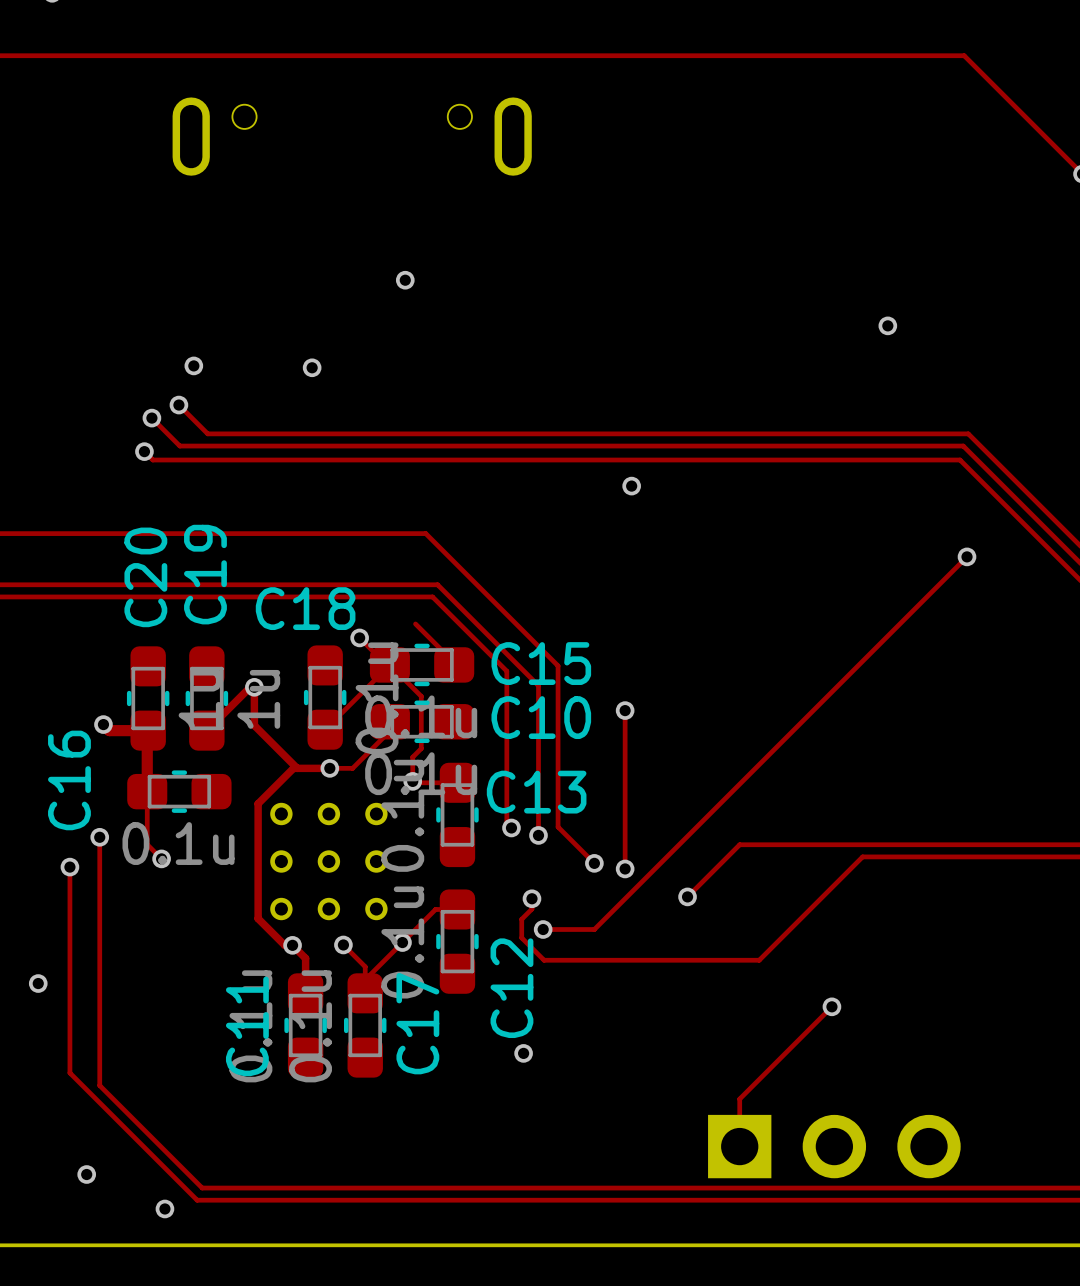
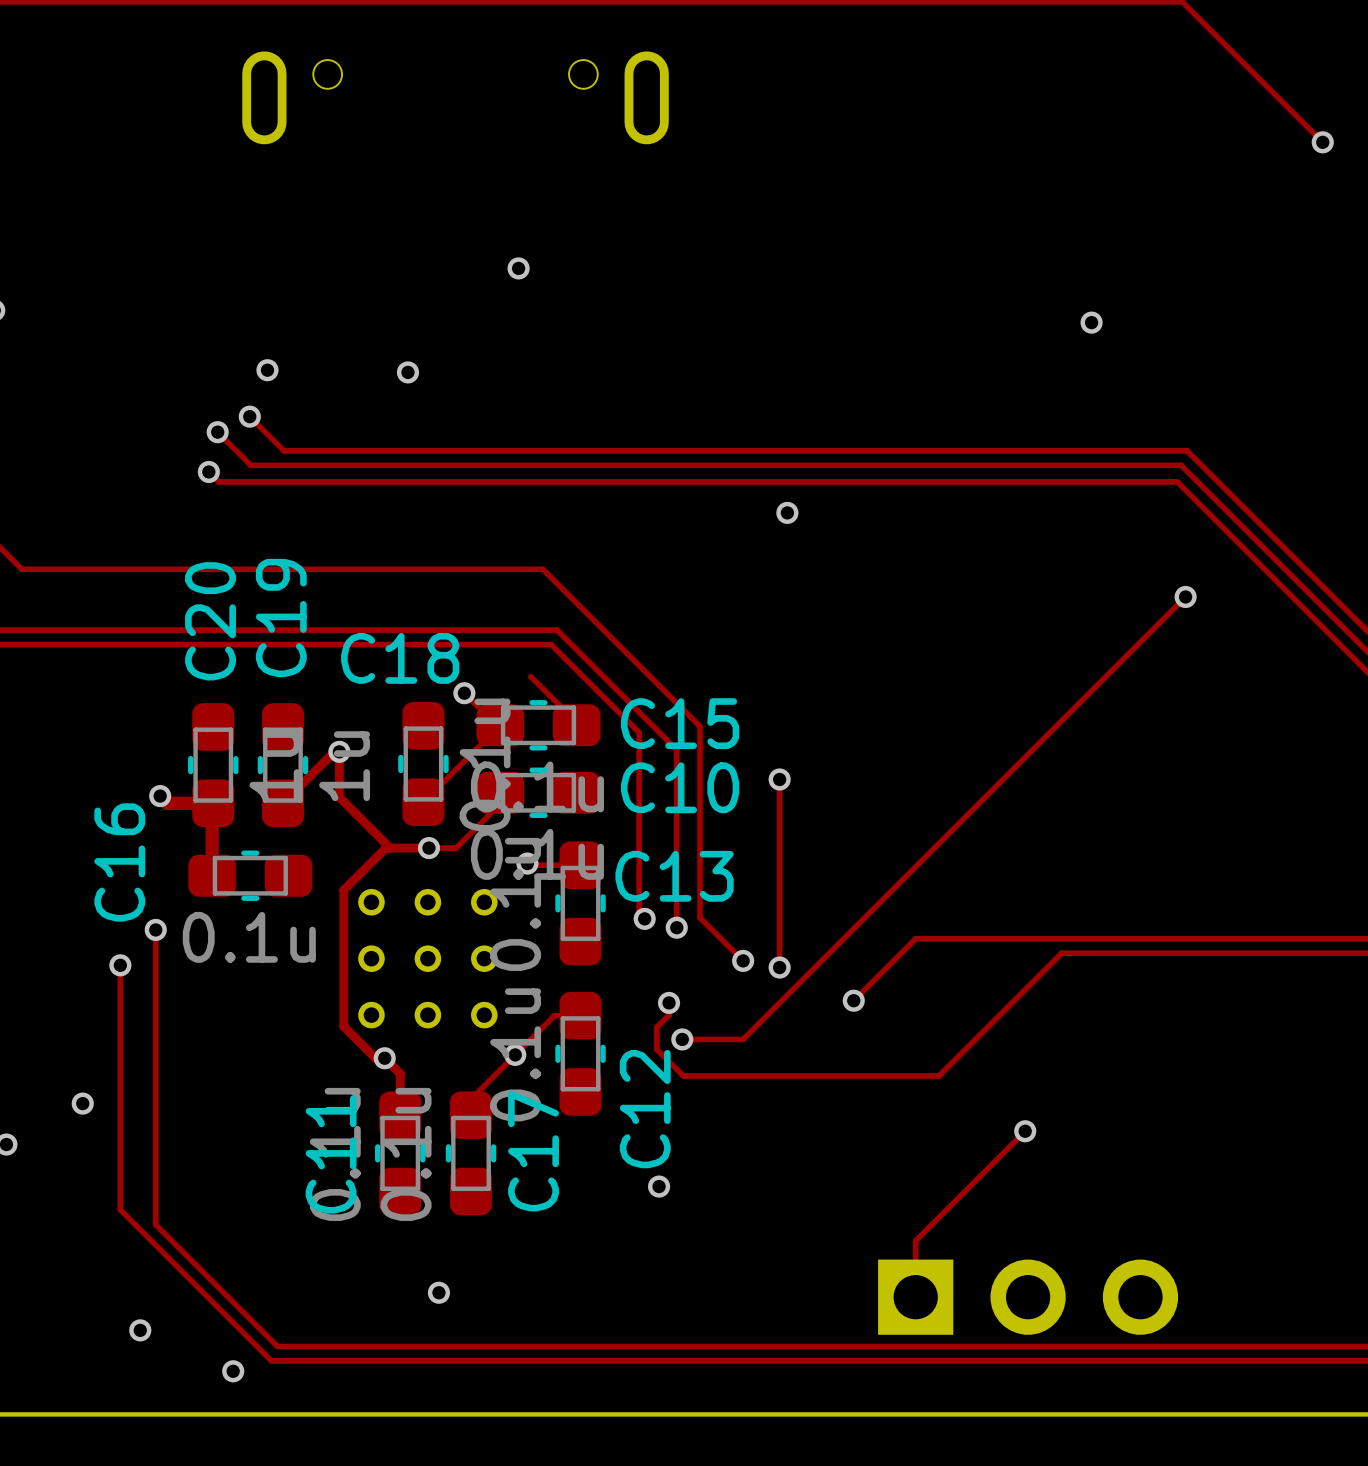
track: (389, 664) (421, 696) (421, 748) (412, 757) (412, 781) -> none
track: (147, 791) (147, 844) (161, 858) -> none
via: (161, 858) -> none
track: (343, 944) (365, 966) (365, 979) -> none
via: (343, 944) -> none
via: none -> (438, 1292)

